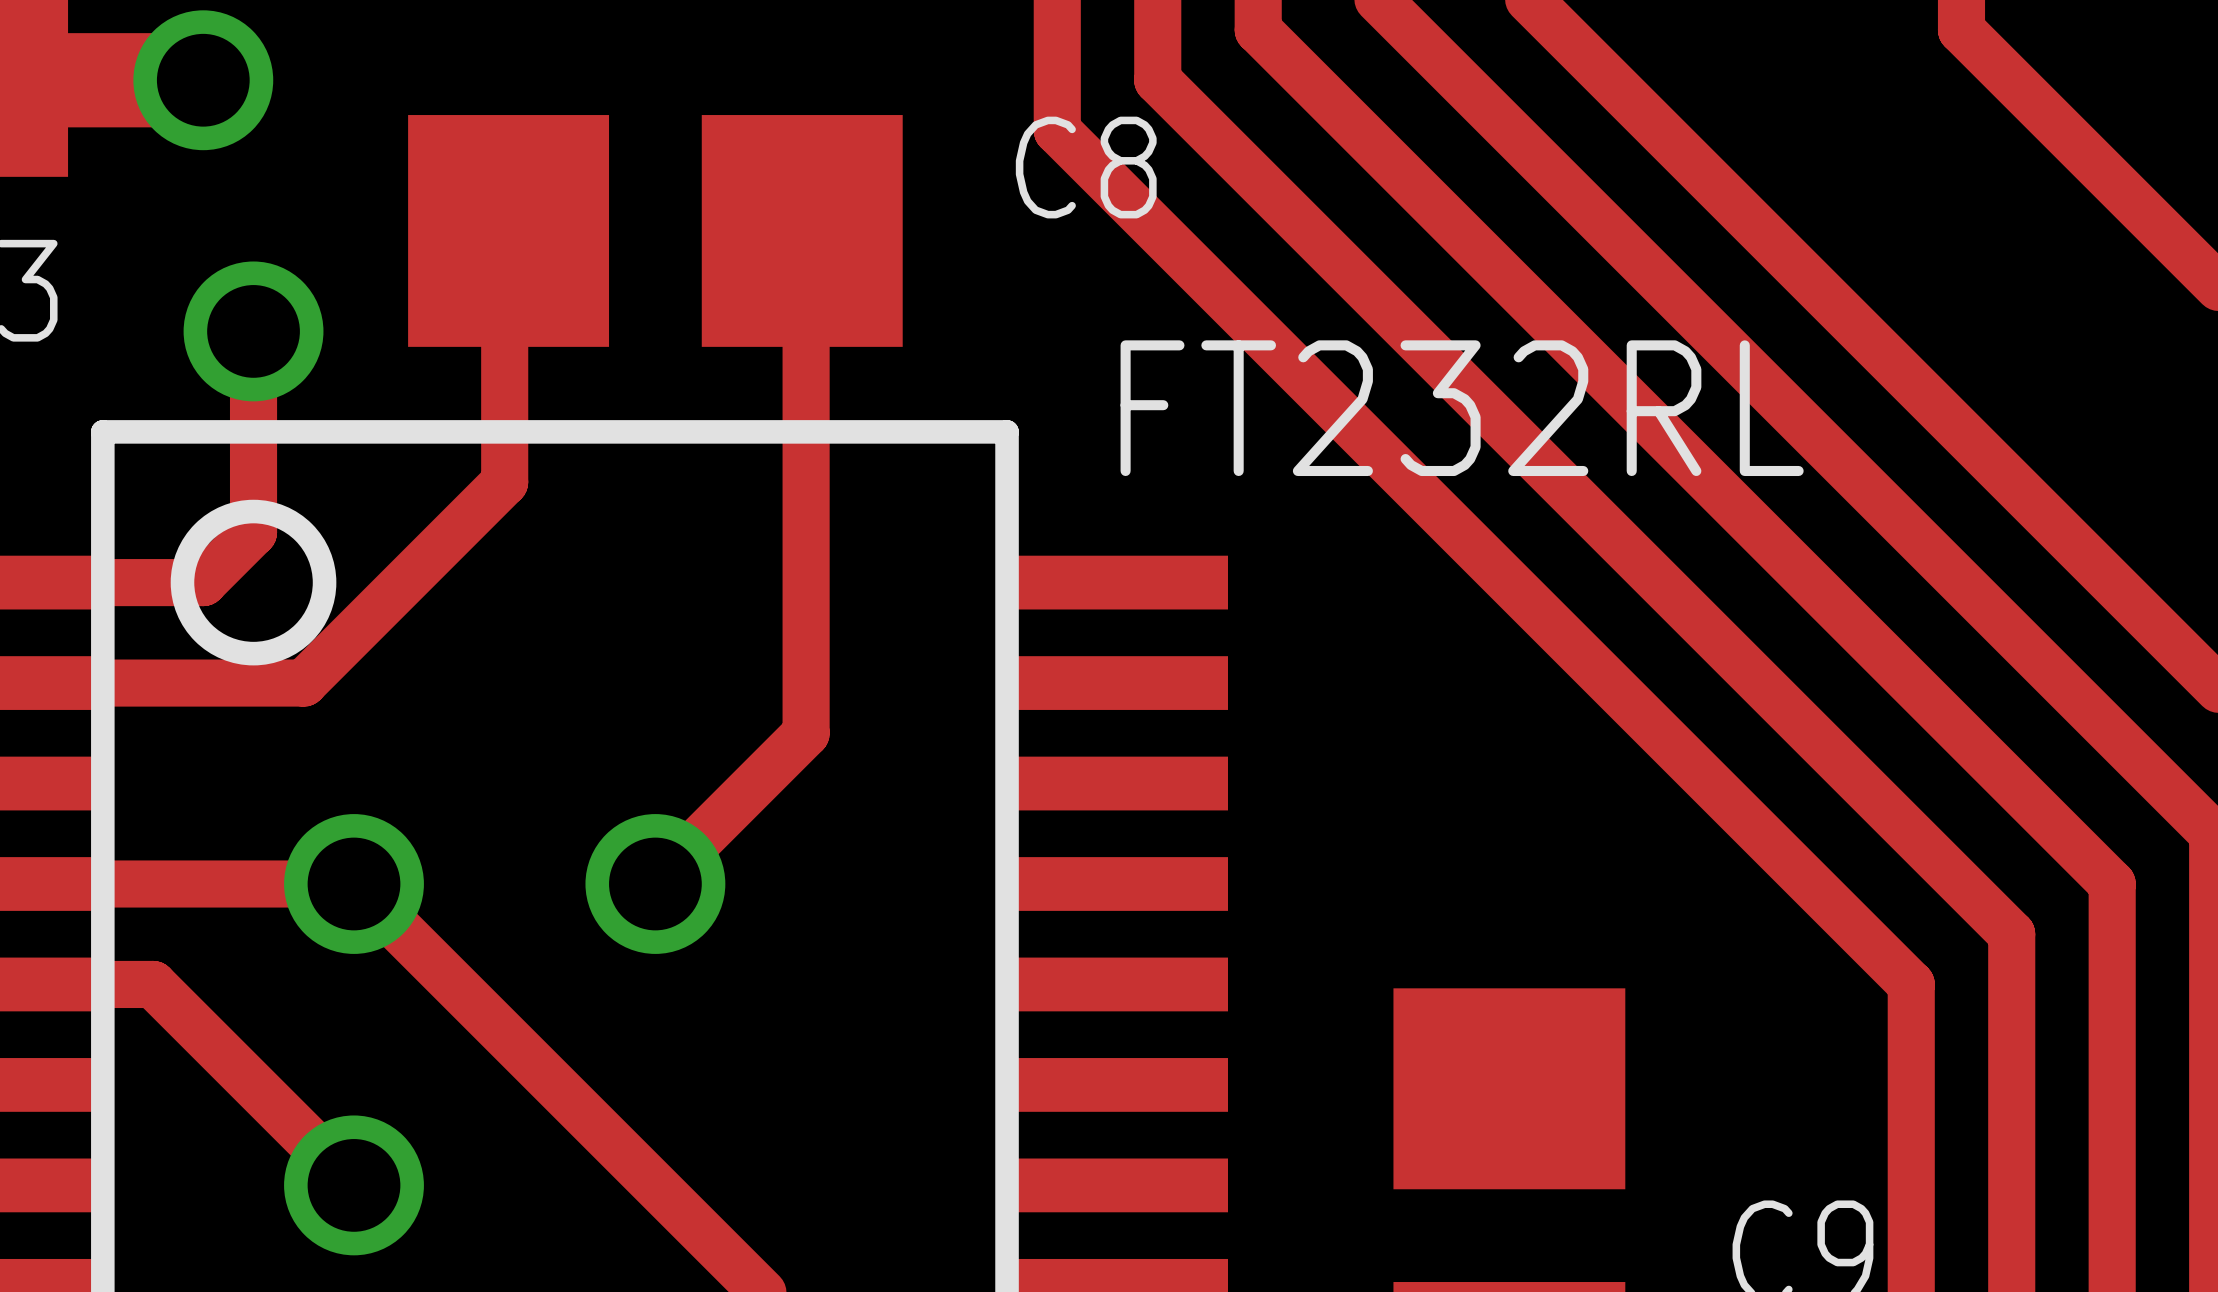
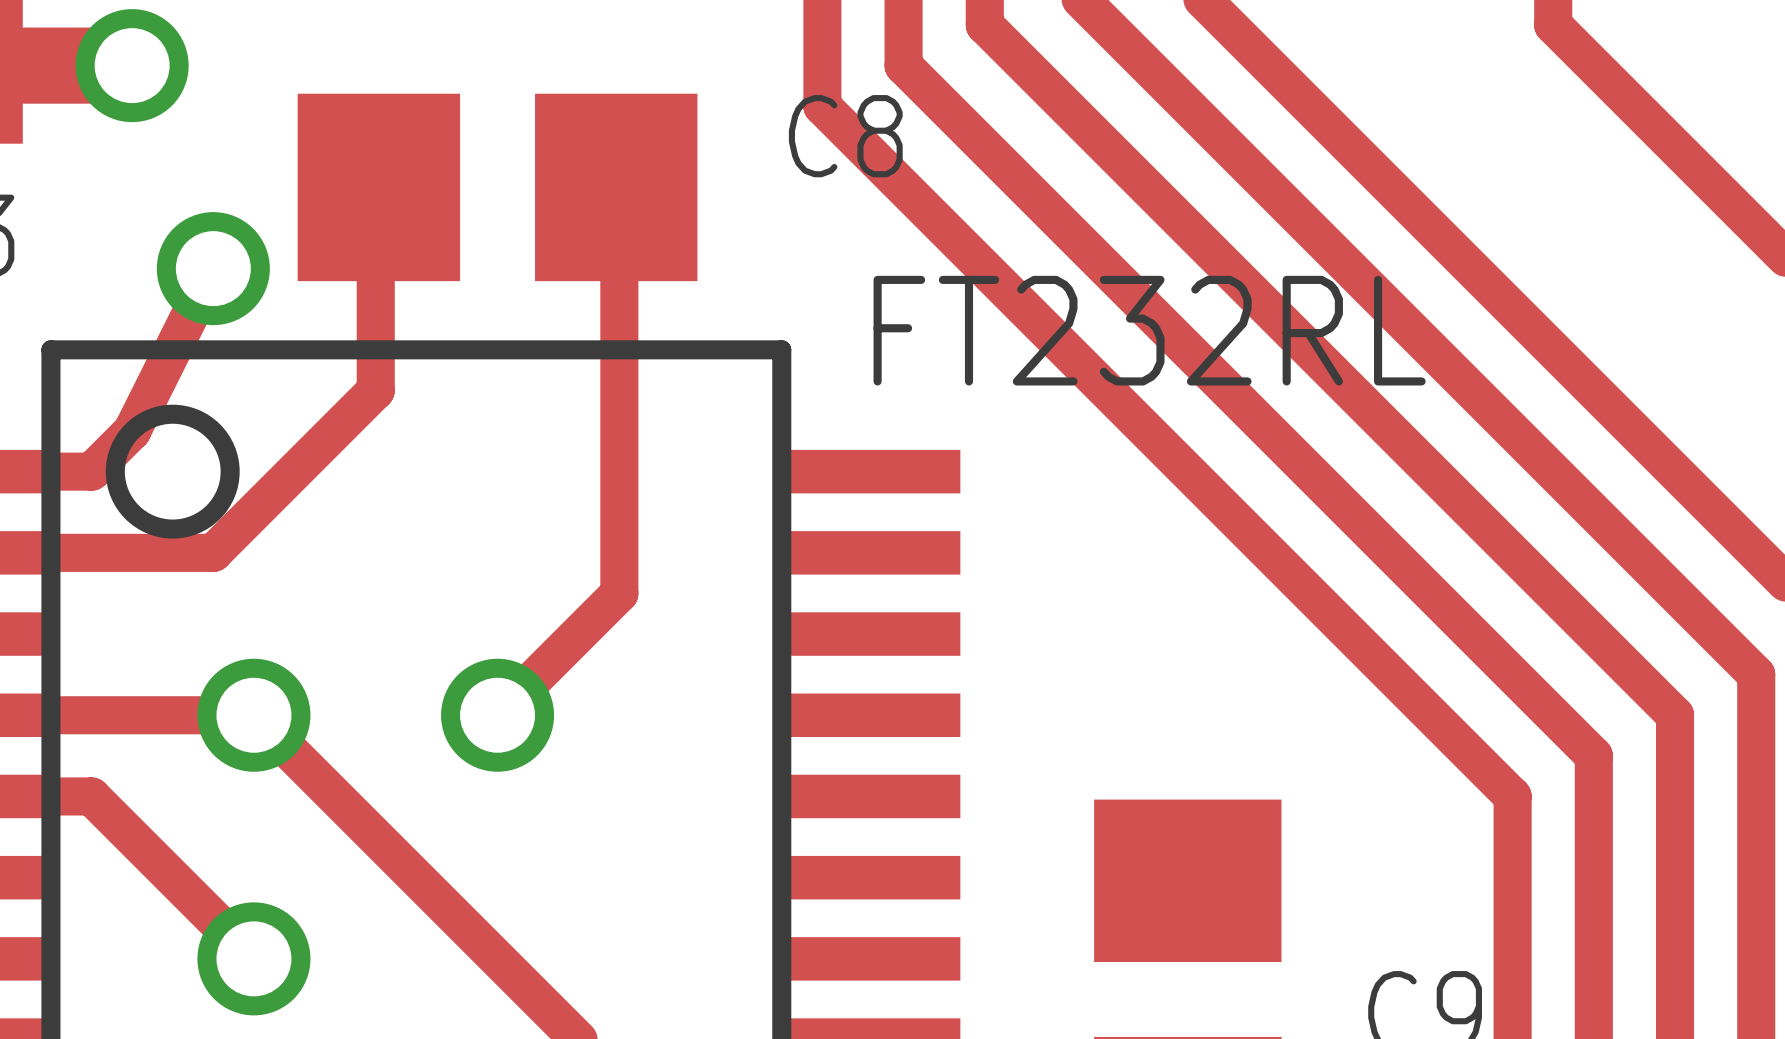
track: (253, 331) (253, 532) (203, 582) (153, 582) -> (213, 268) (132, 431) (91, 471)
via position: (253, 331) -> (213, 268)

